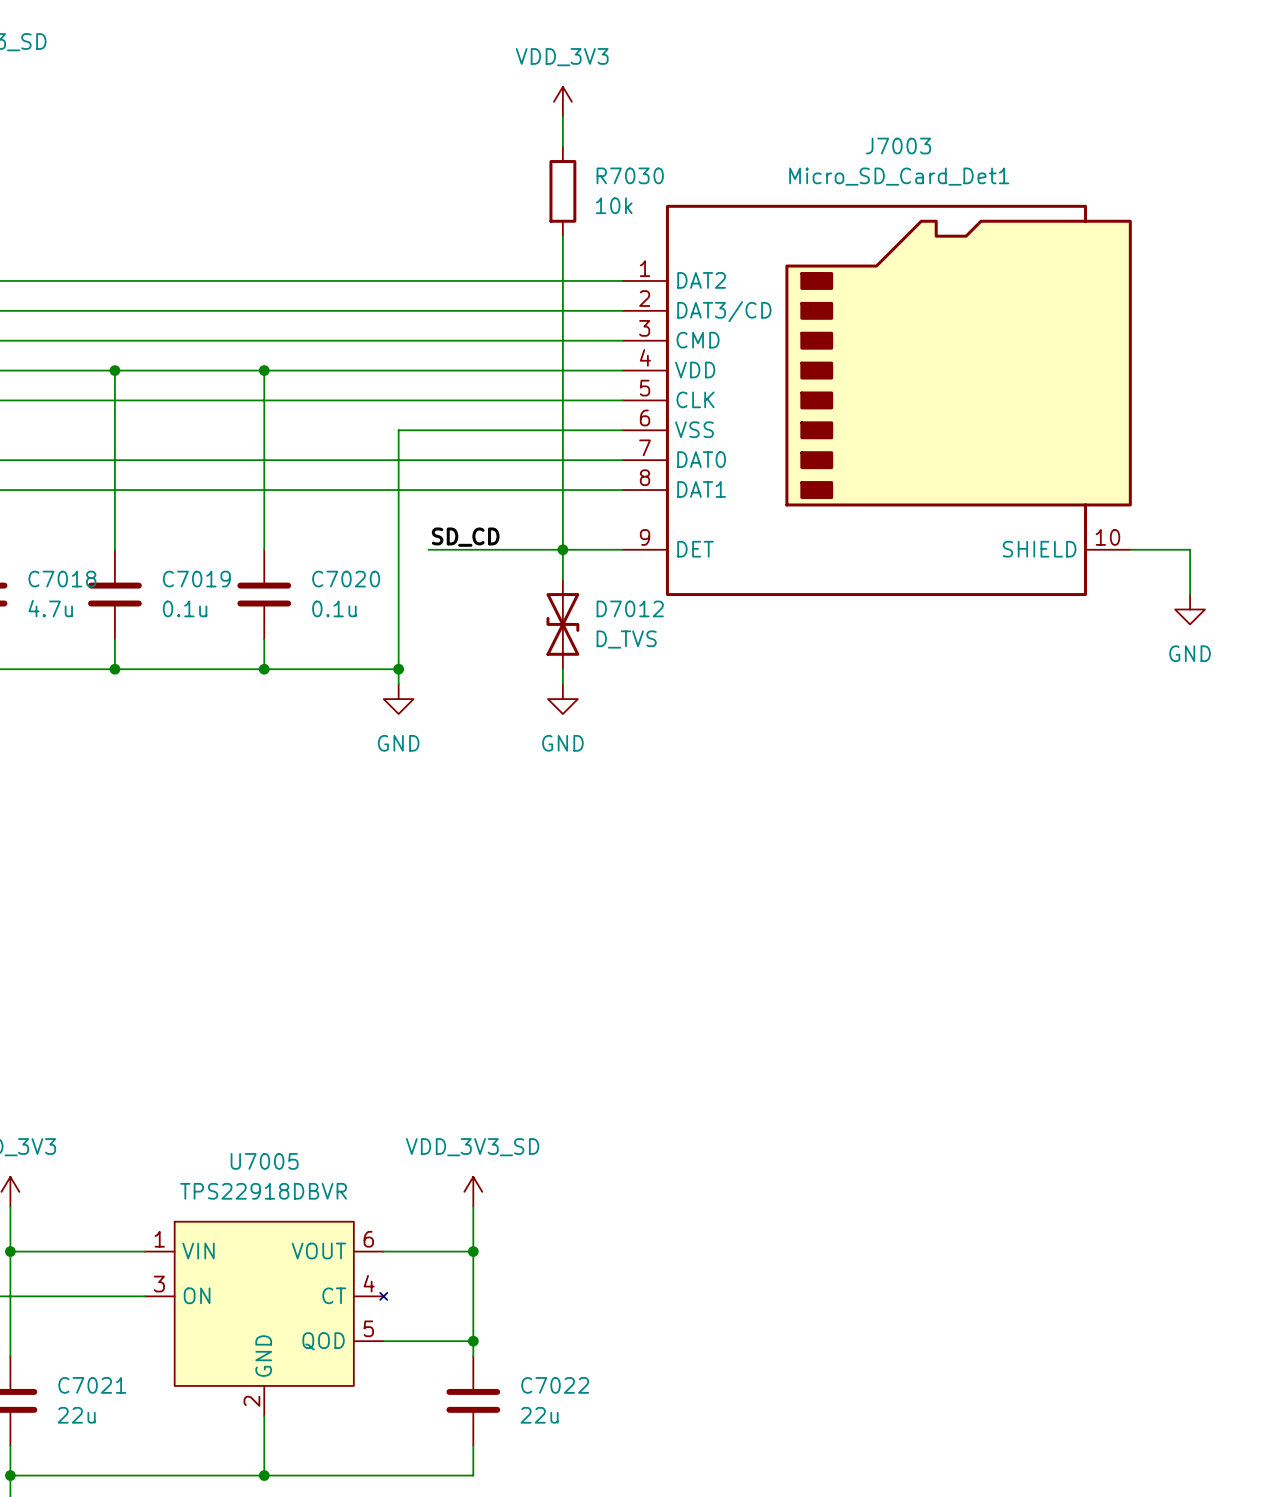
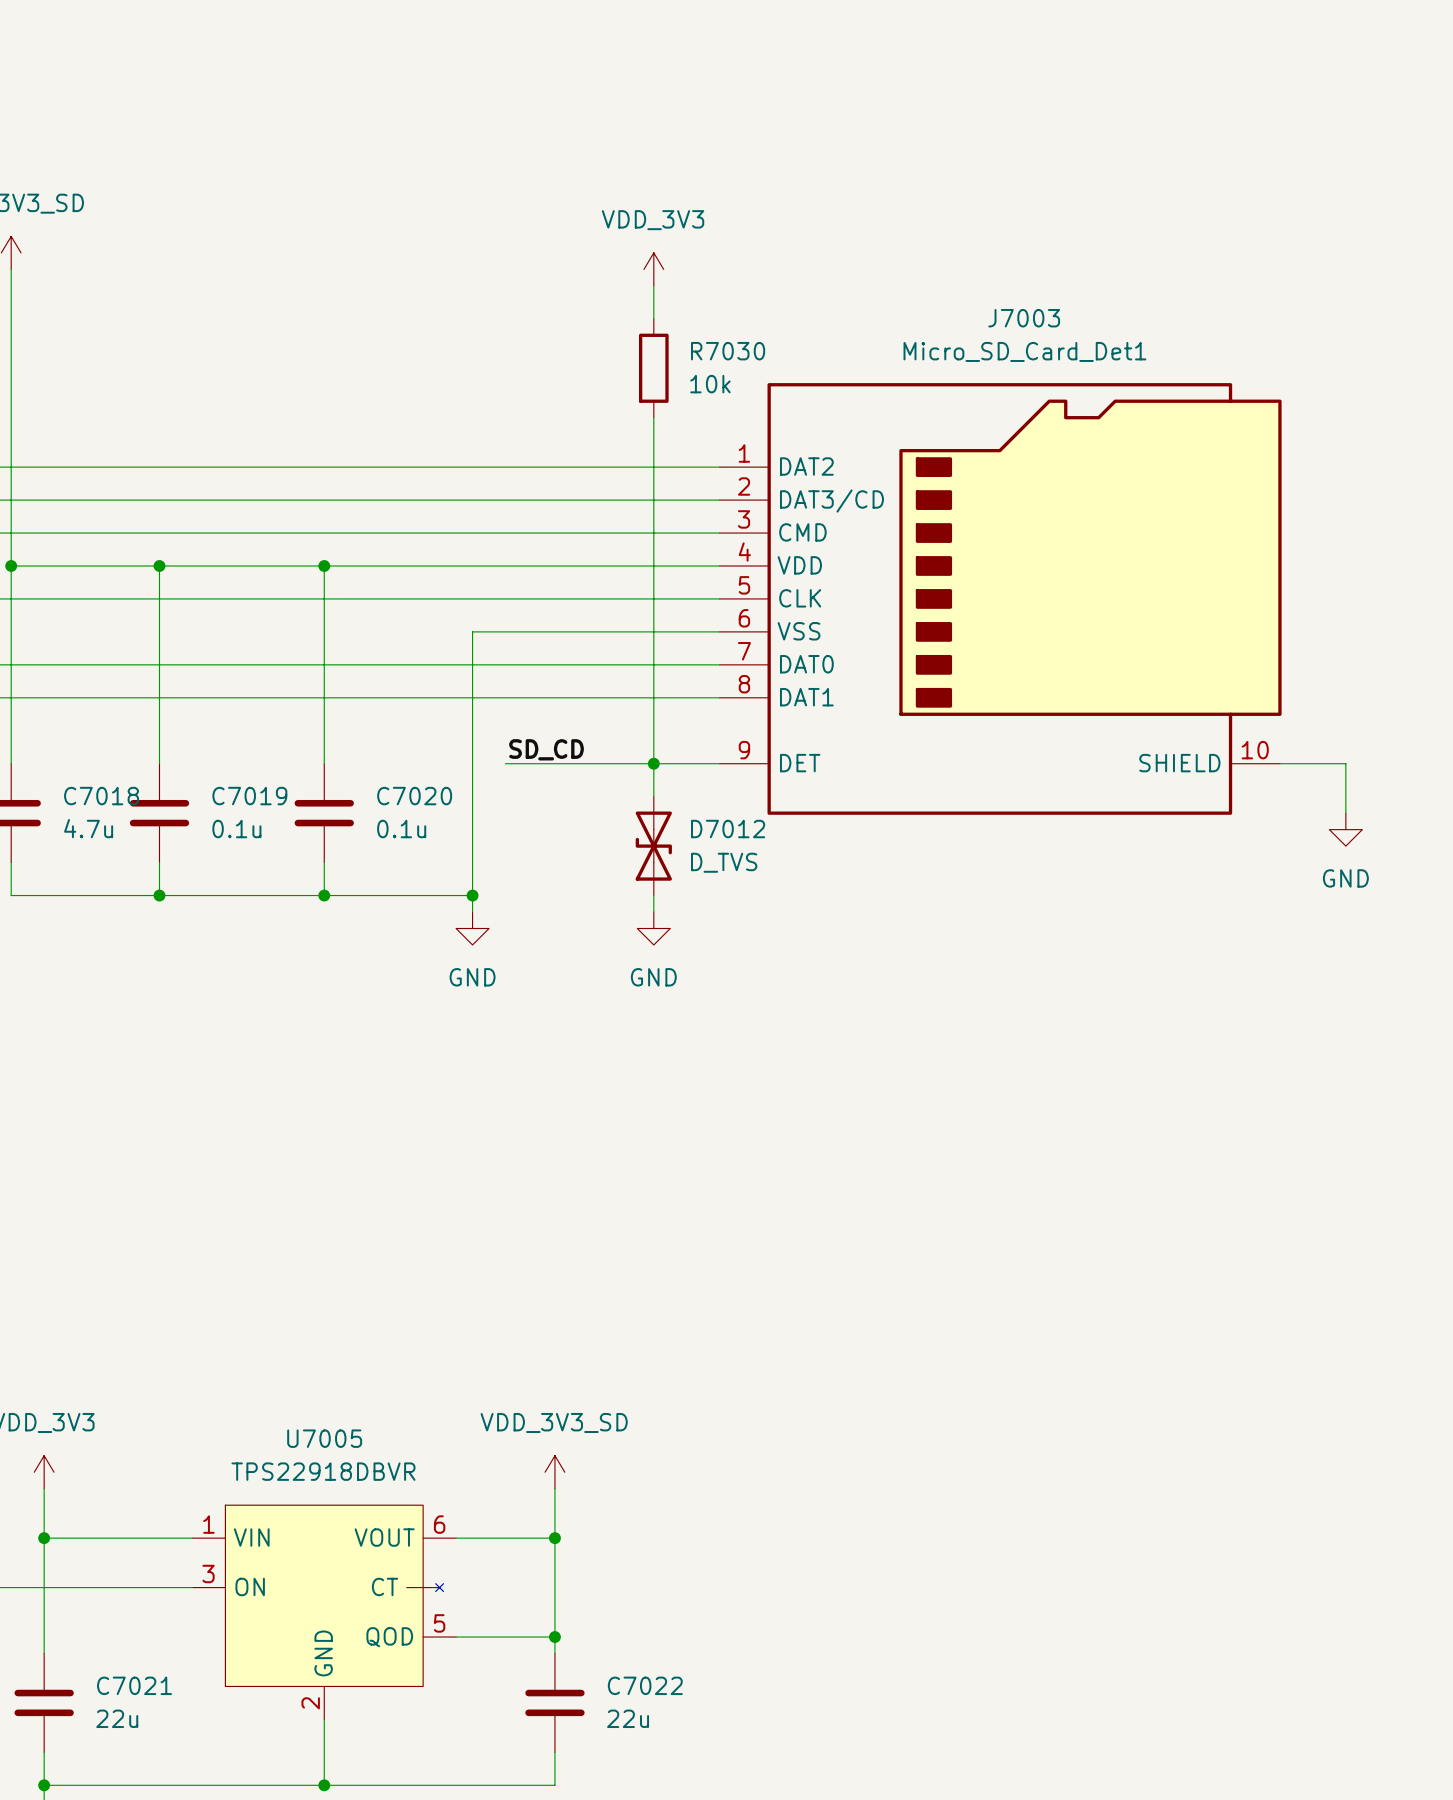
U7005 symbol: [144, 1221, 388, 1416] -> [192, 1505, 457, 1720]

